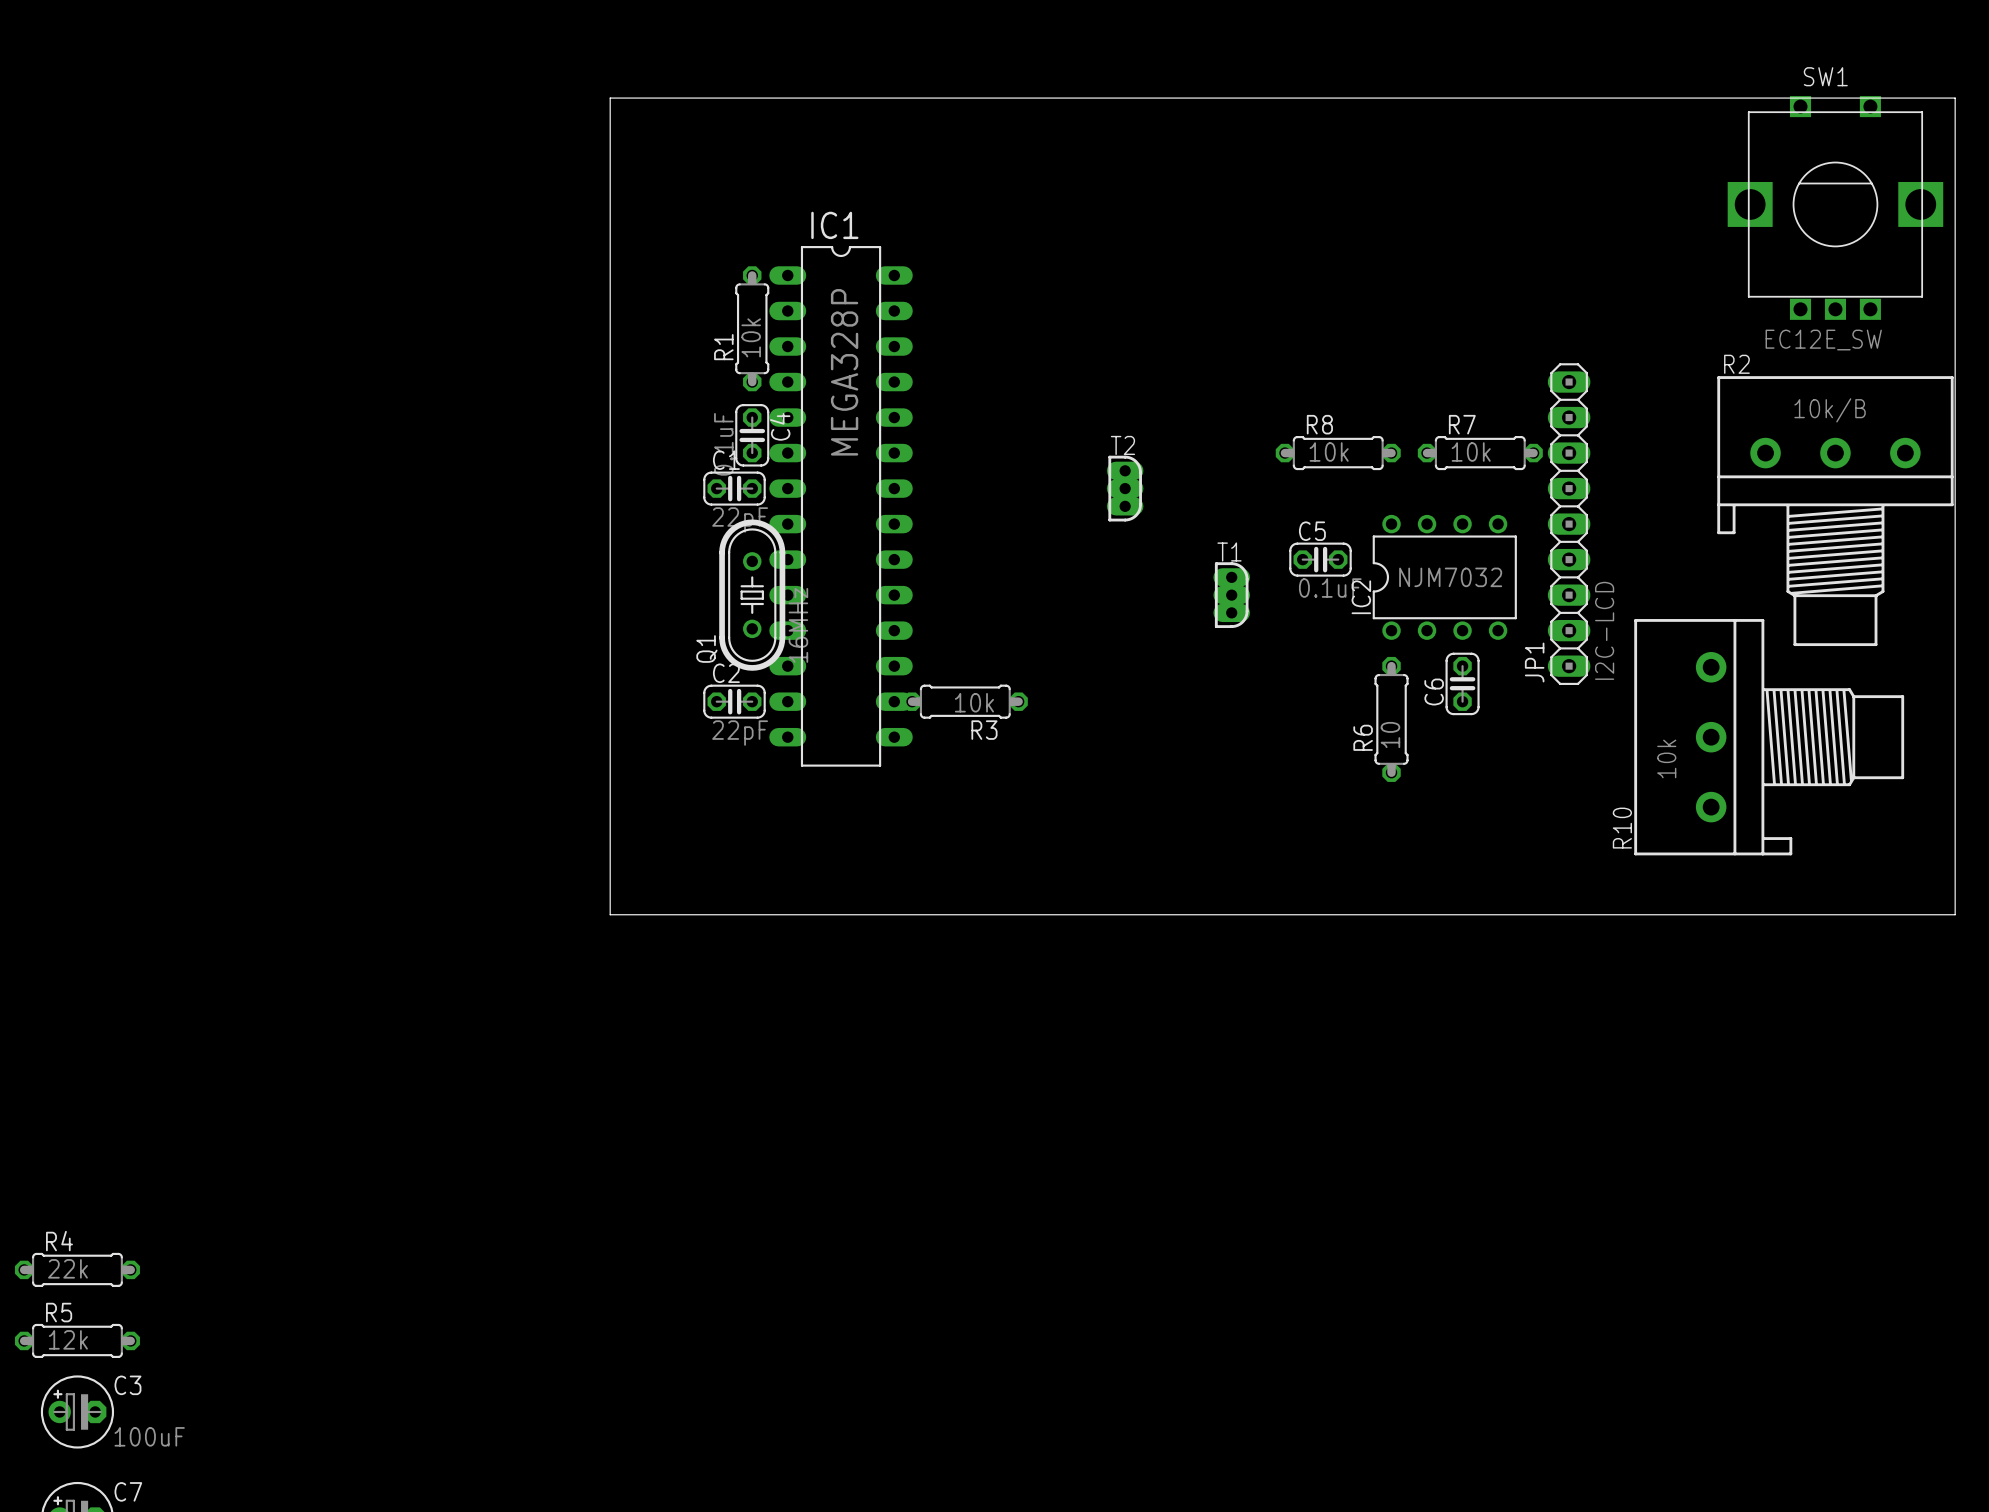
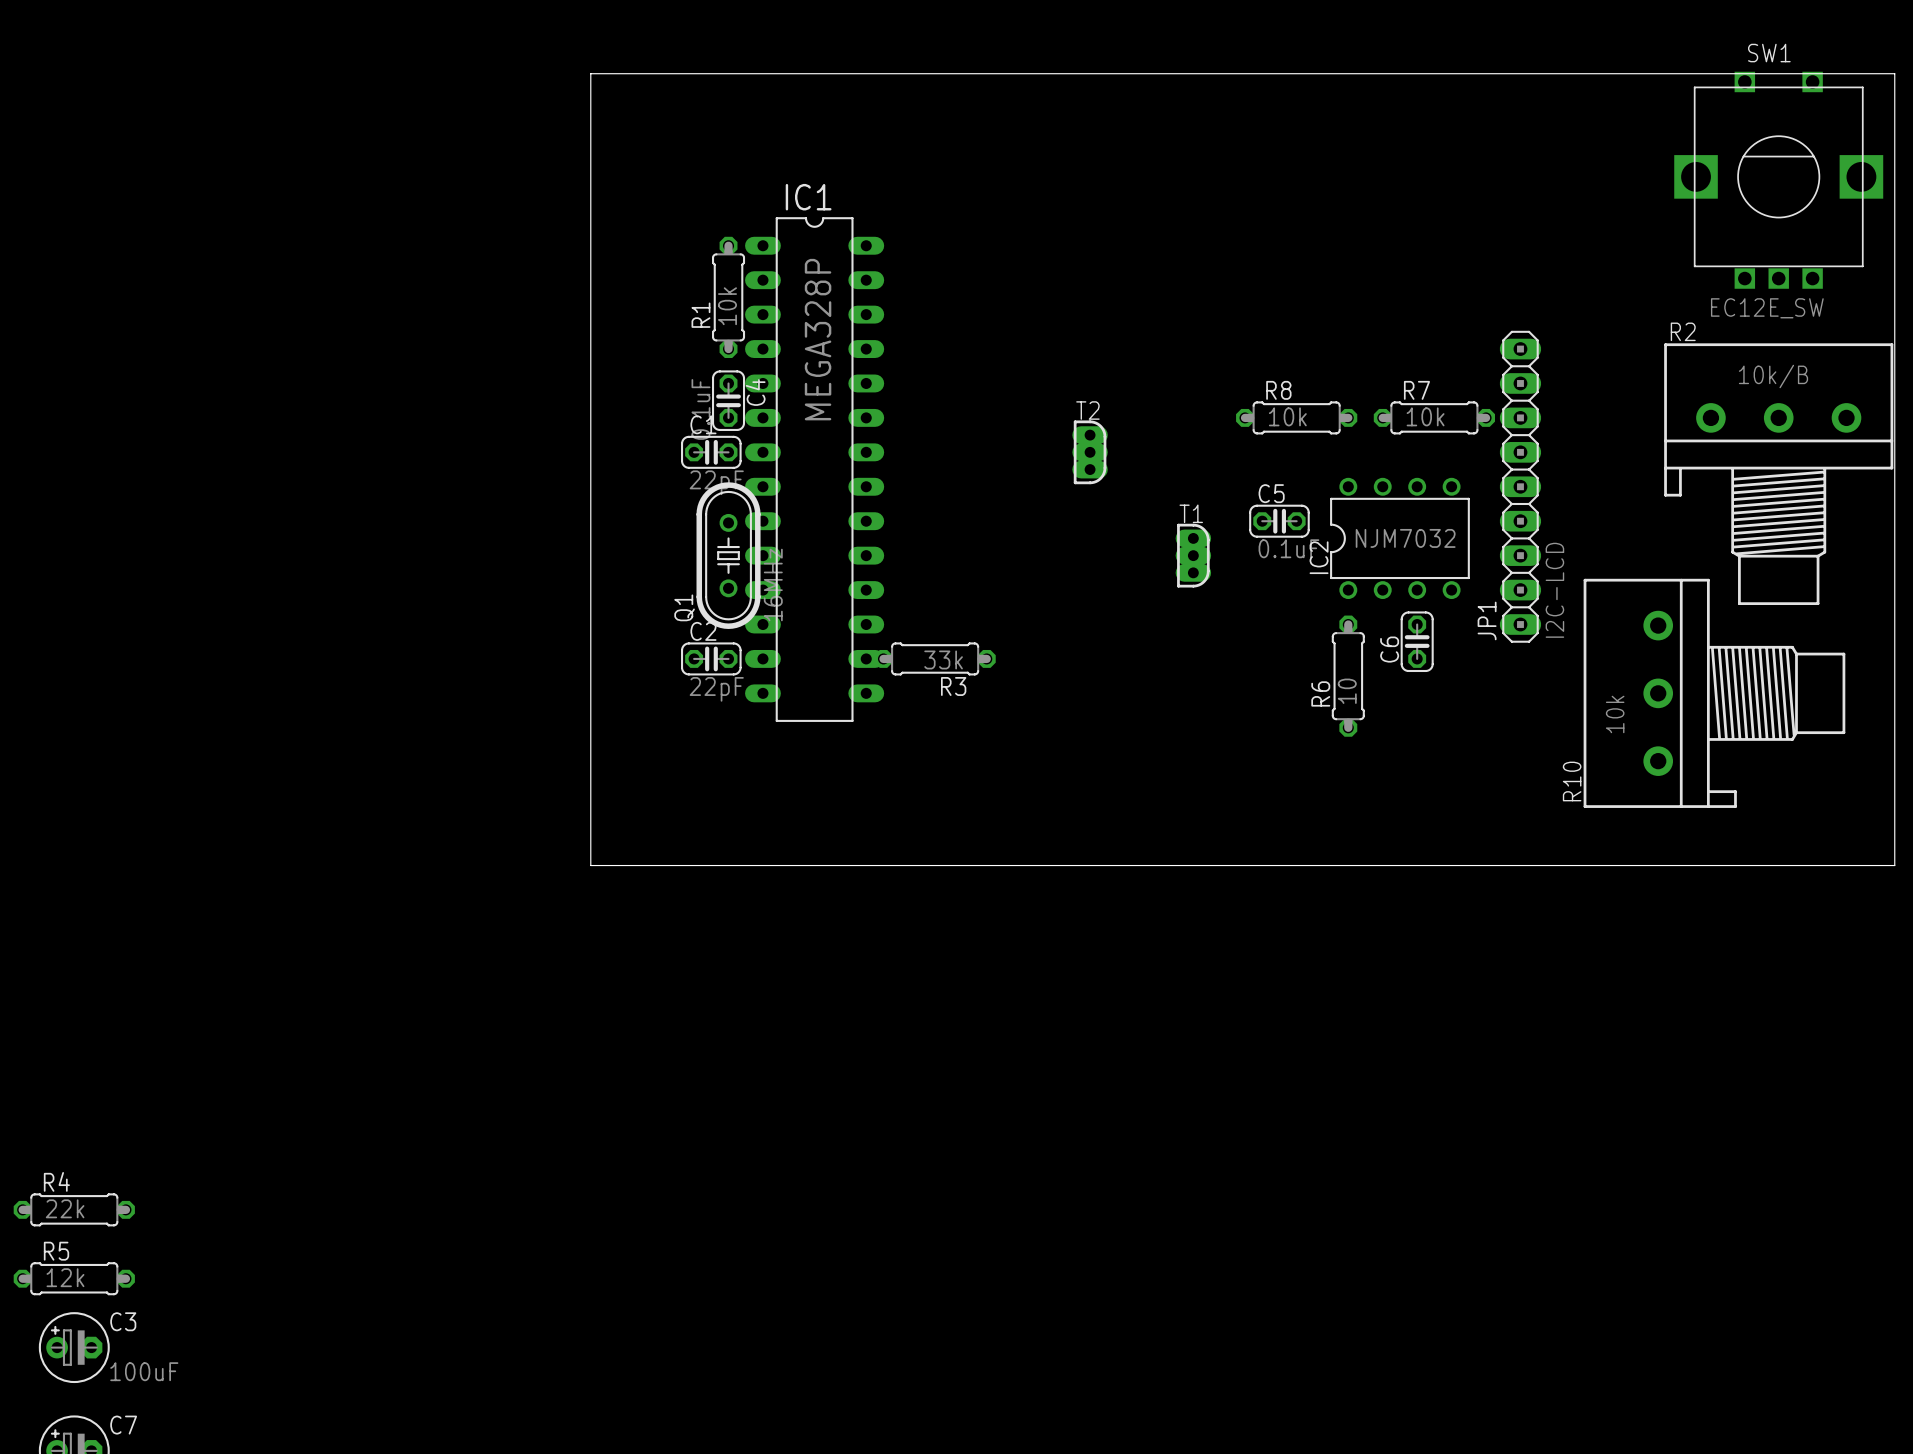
R3 value: 10k (974, 702) -> 33k (943, 659)

